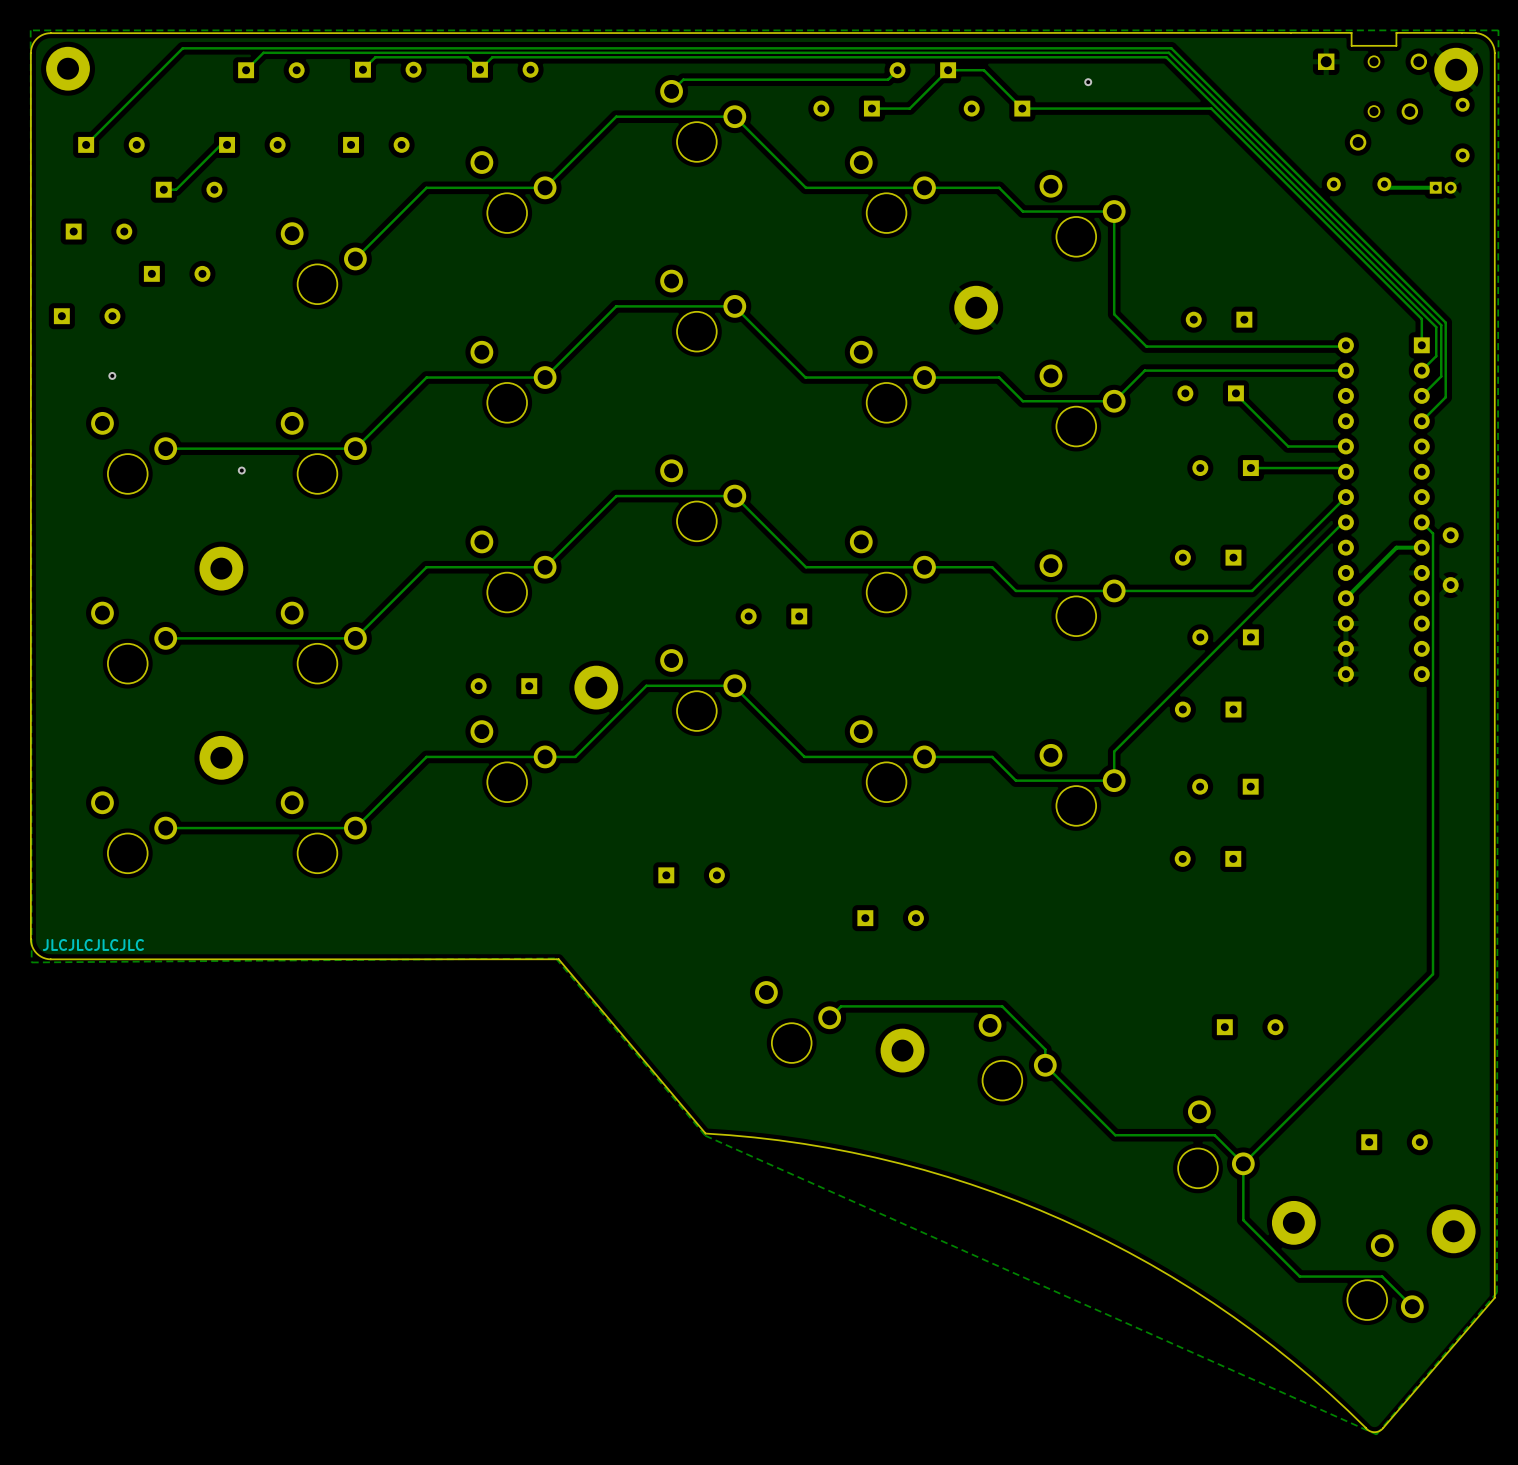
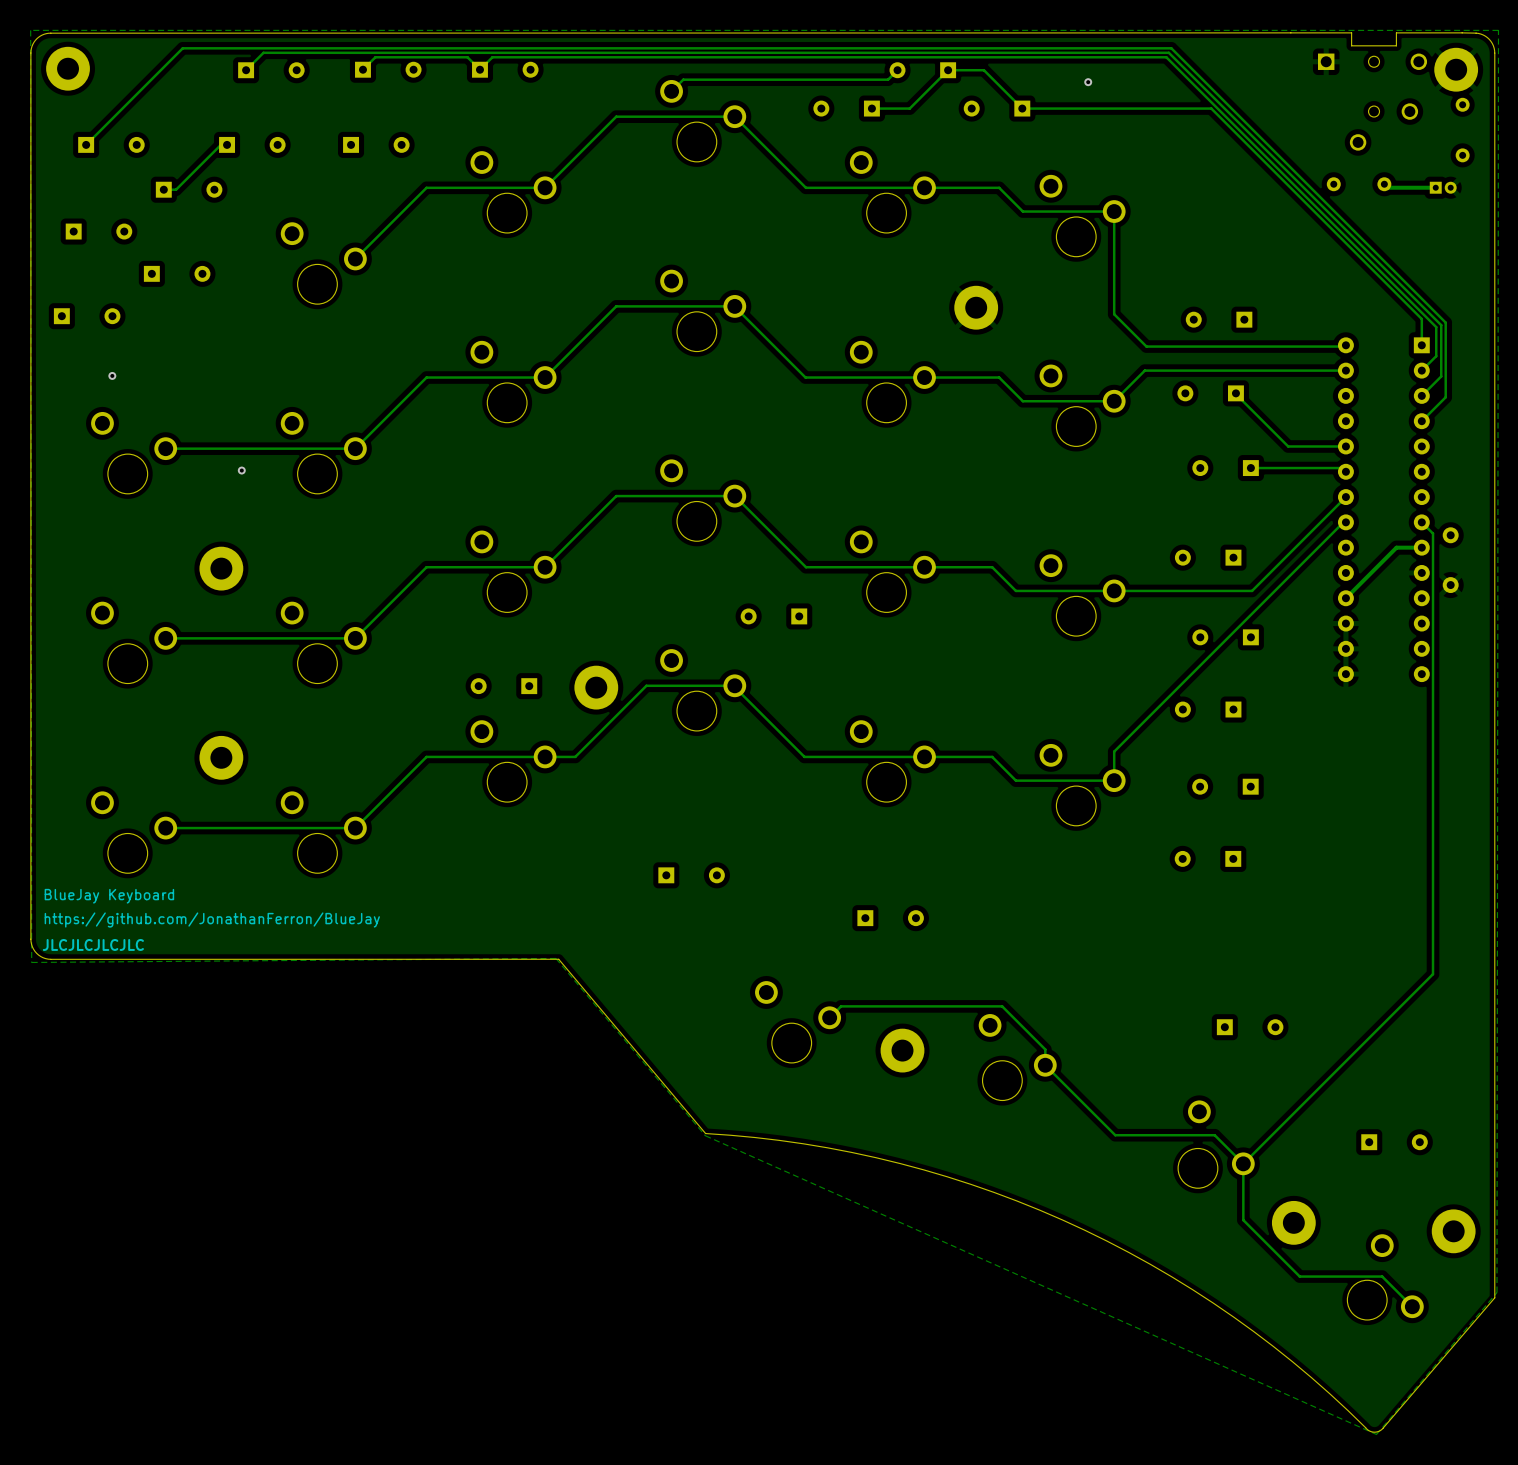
text: none -> BlueJay Keyboard (109, 896)
text: none -> https://github.com/JonathanFerron/BlueJay (212, 919)

